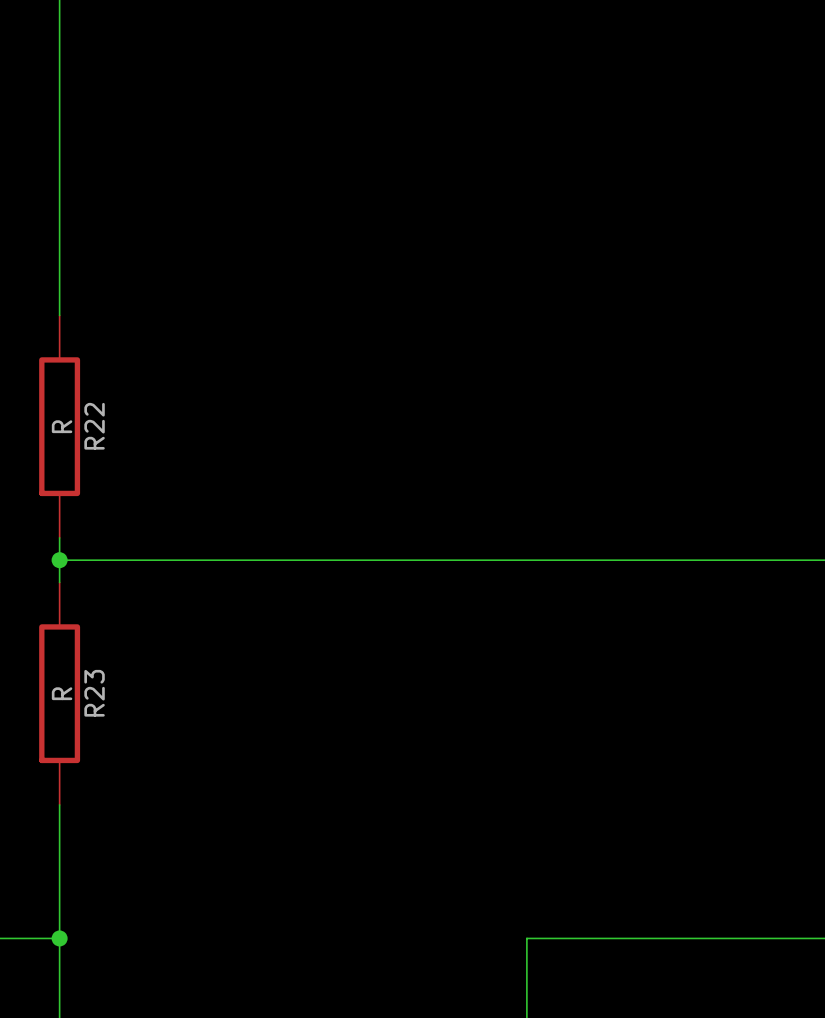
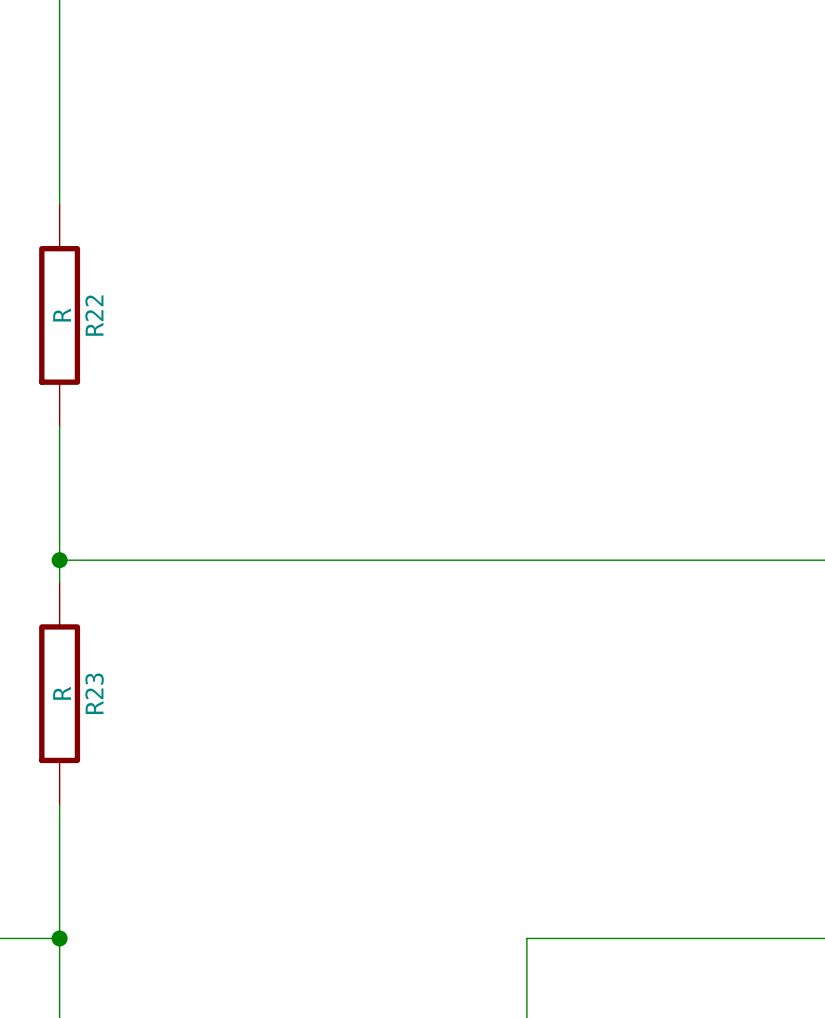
wire: (59, 204) (59, 315) -> (59, 426) (59, 537)
R22 position: (59, 426) -> (59, 315)

